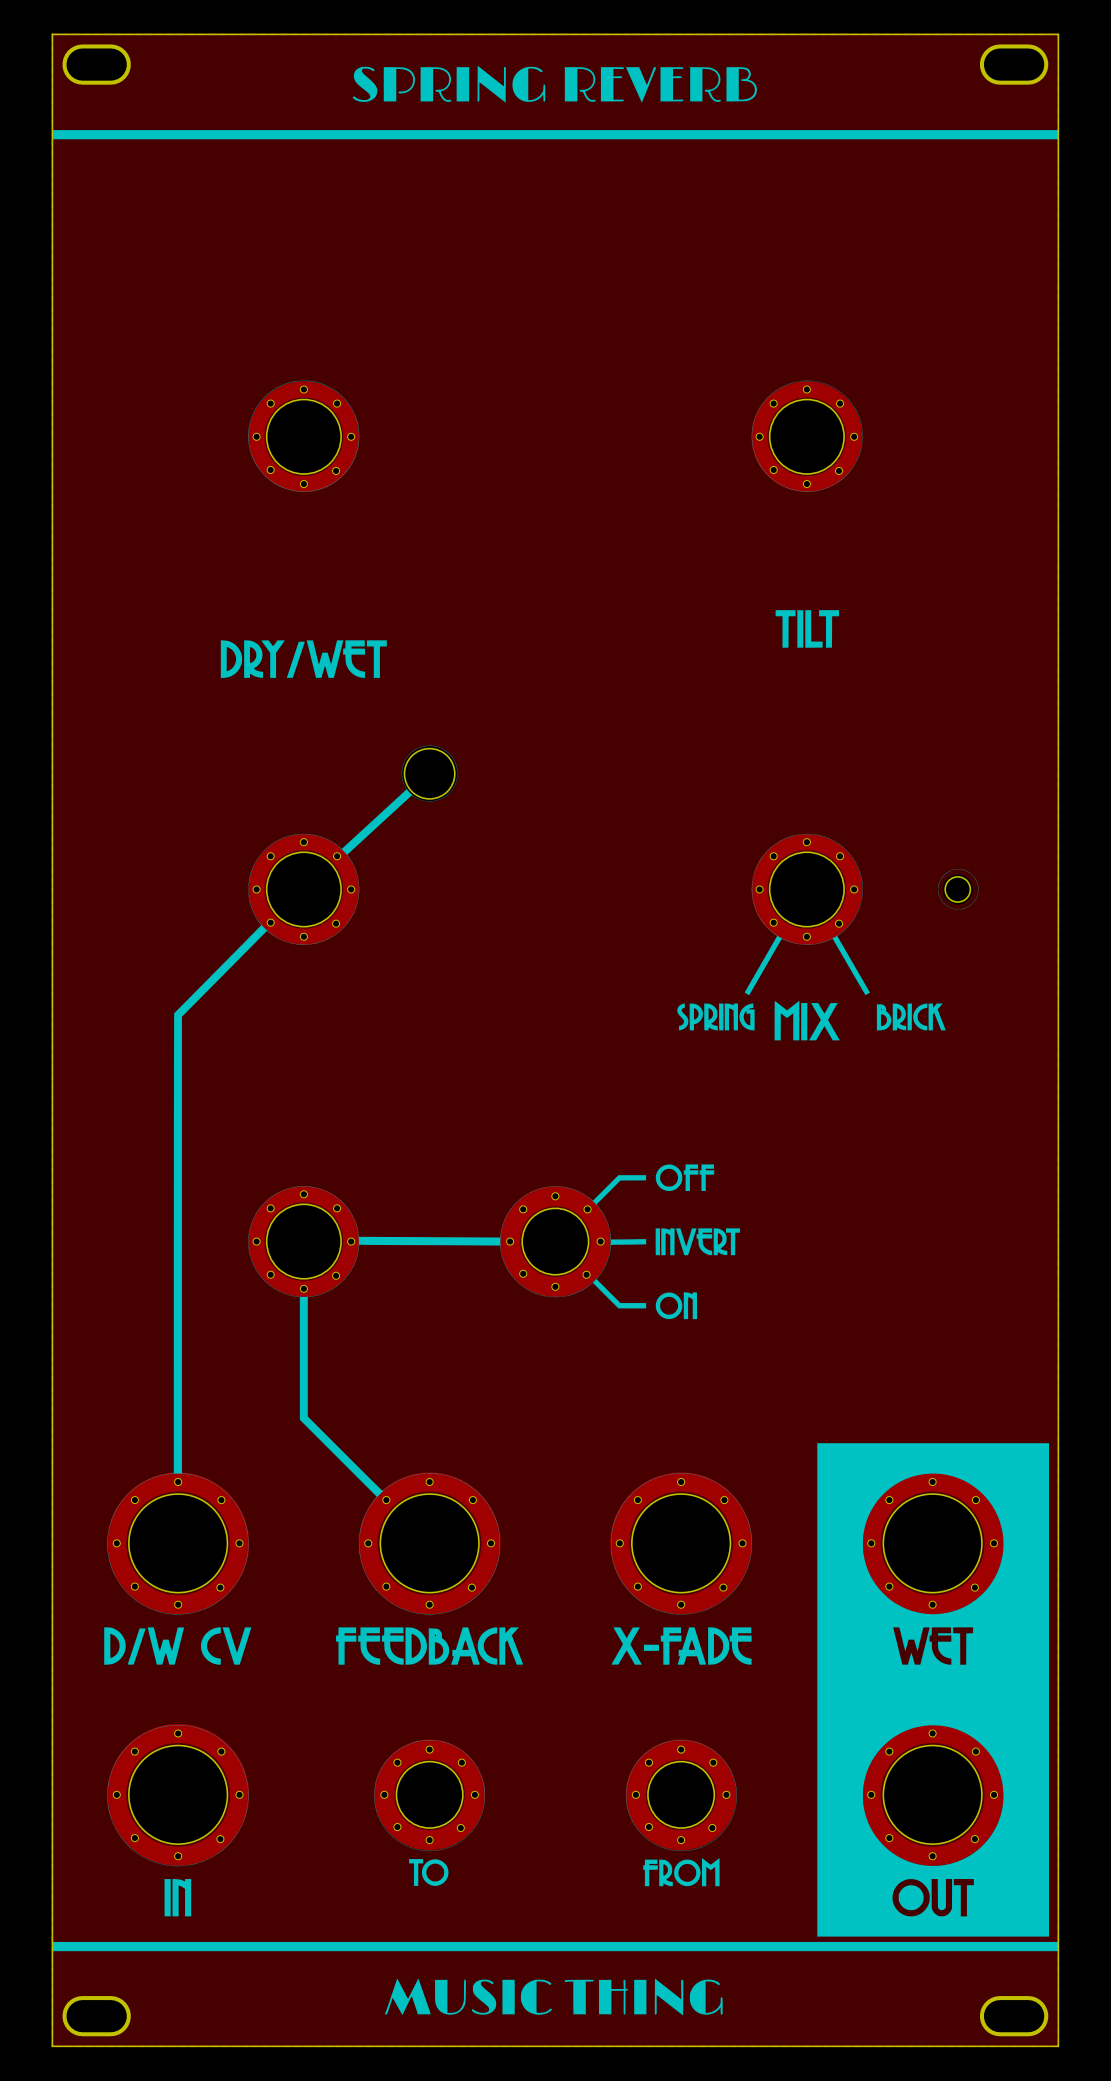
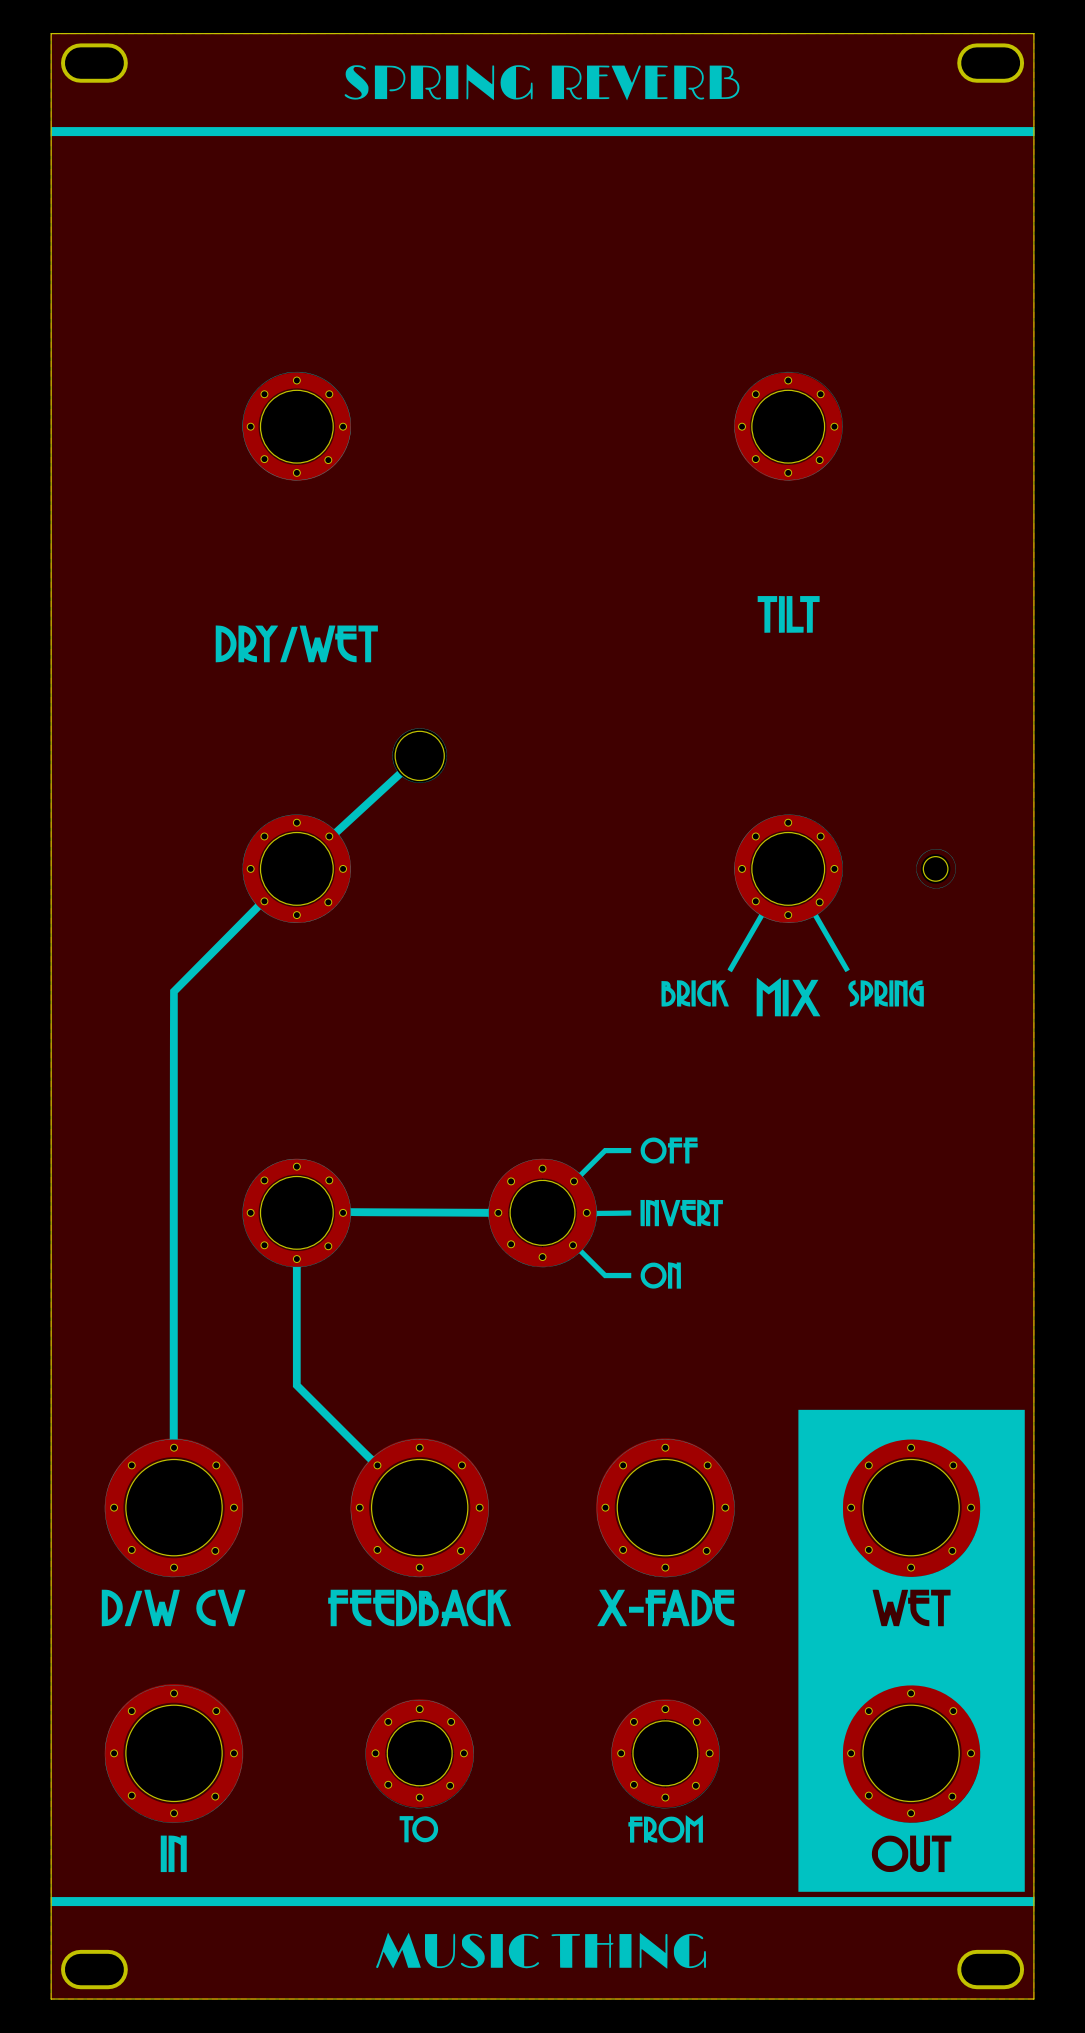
drawing shape: [52, 65, 1060, 2016] -> [50, 64, 1035, 1969]

